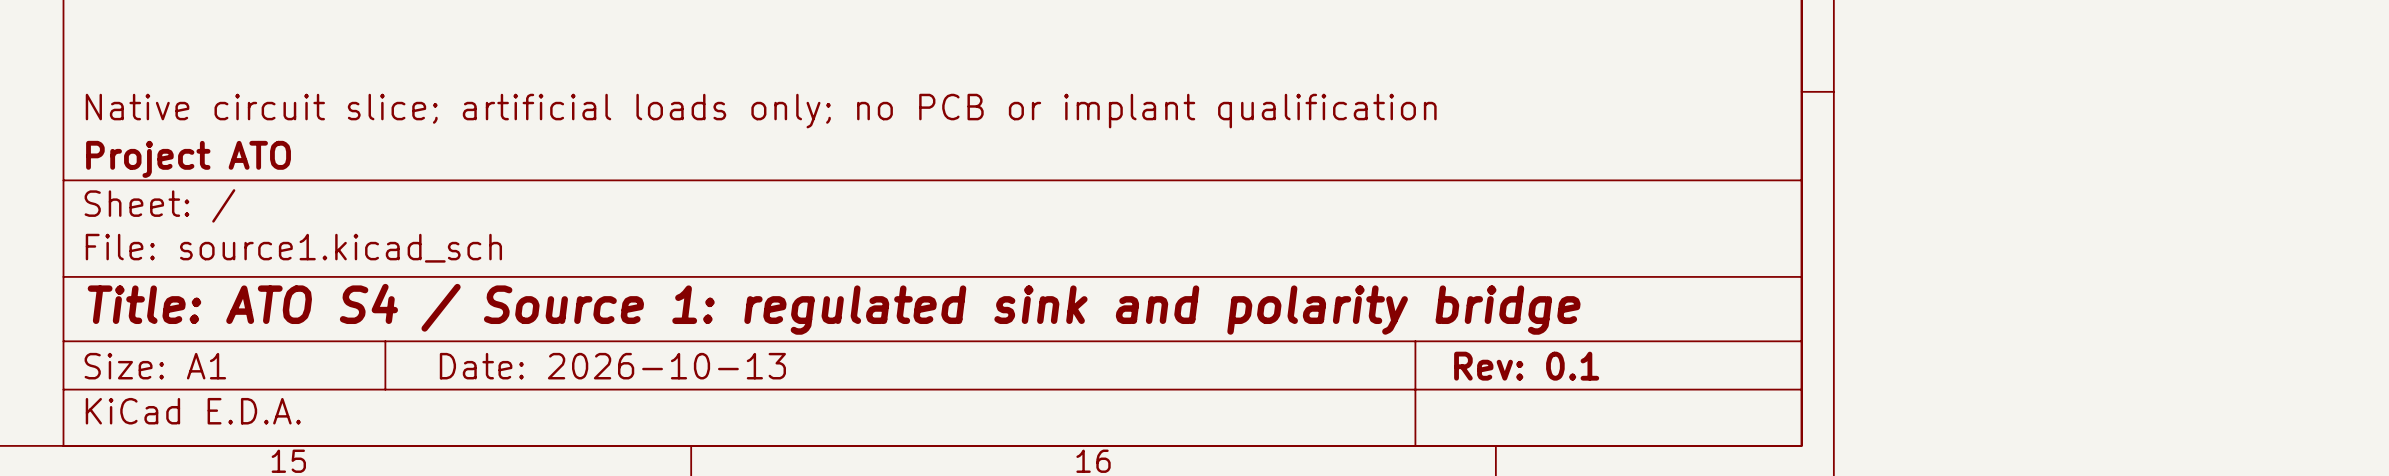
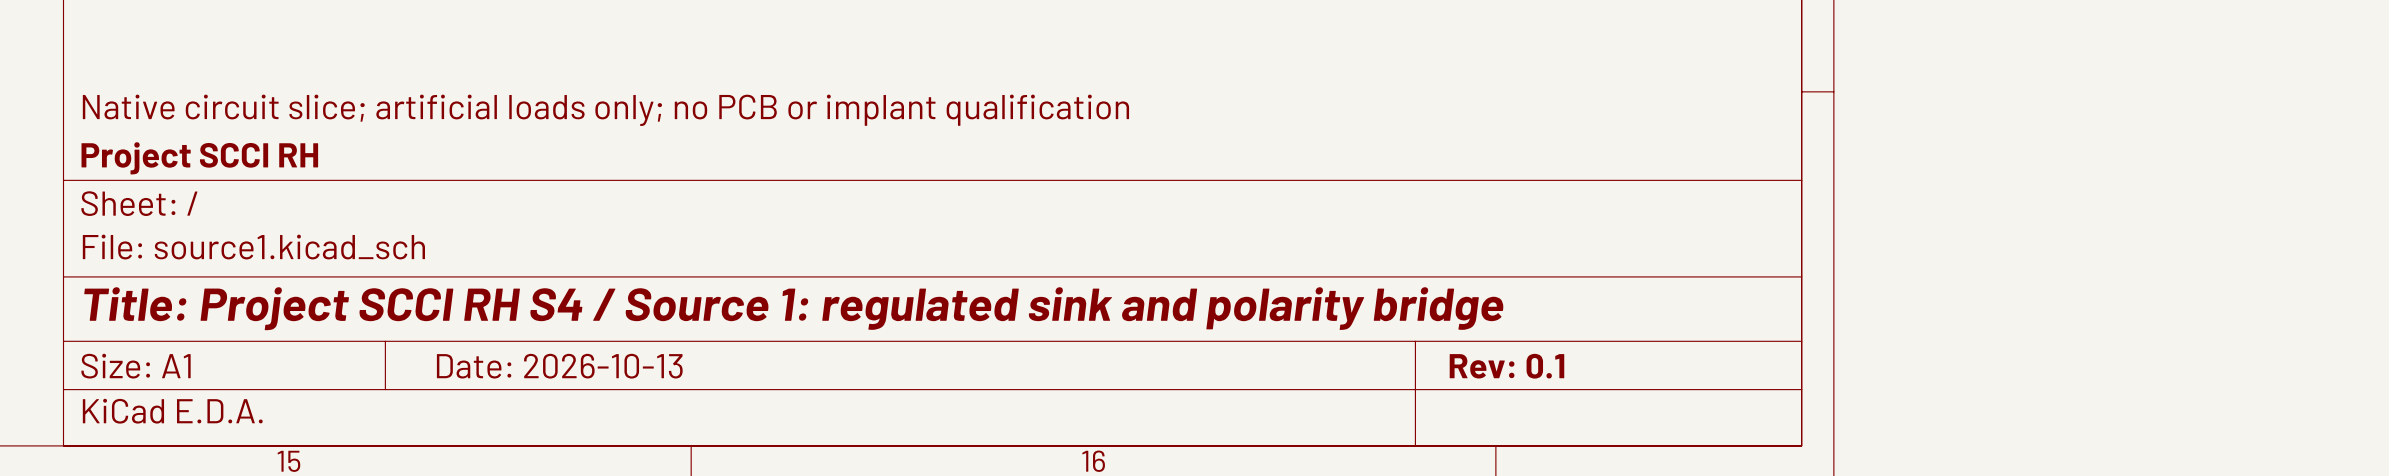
title block: Project ATO (188, 159) -> Project SCCI RH (199, 158)
title block: Title: ATO S4 / Source 1: regulated sink and polarity bridge (834, 309) -> Title: Project SCCI RH S4 / Source 1: regulated sink and polarity bridge (793, 308)

